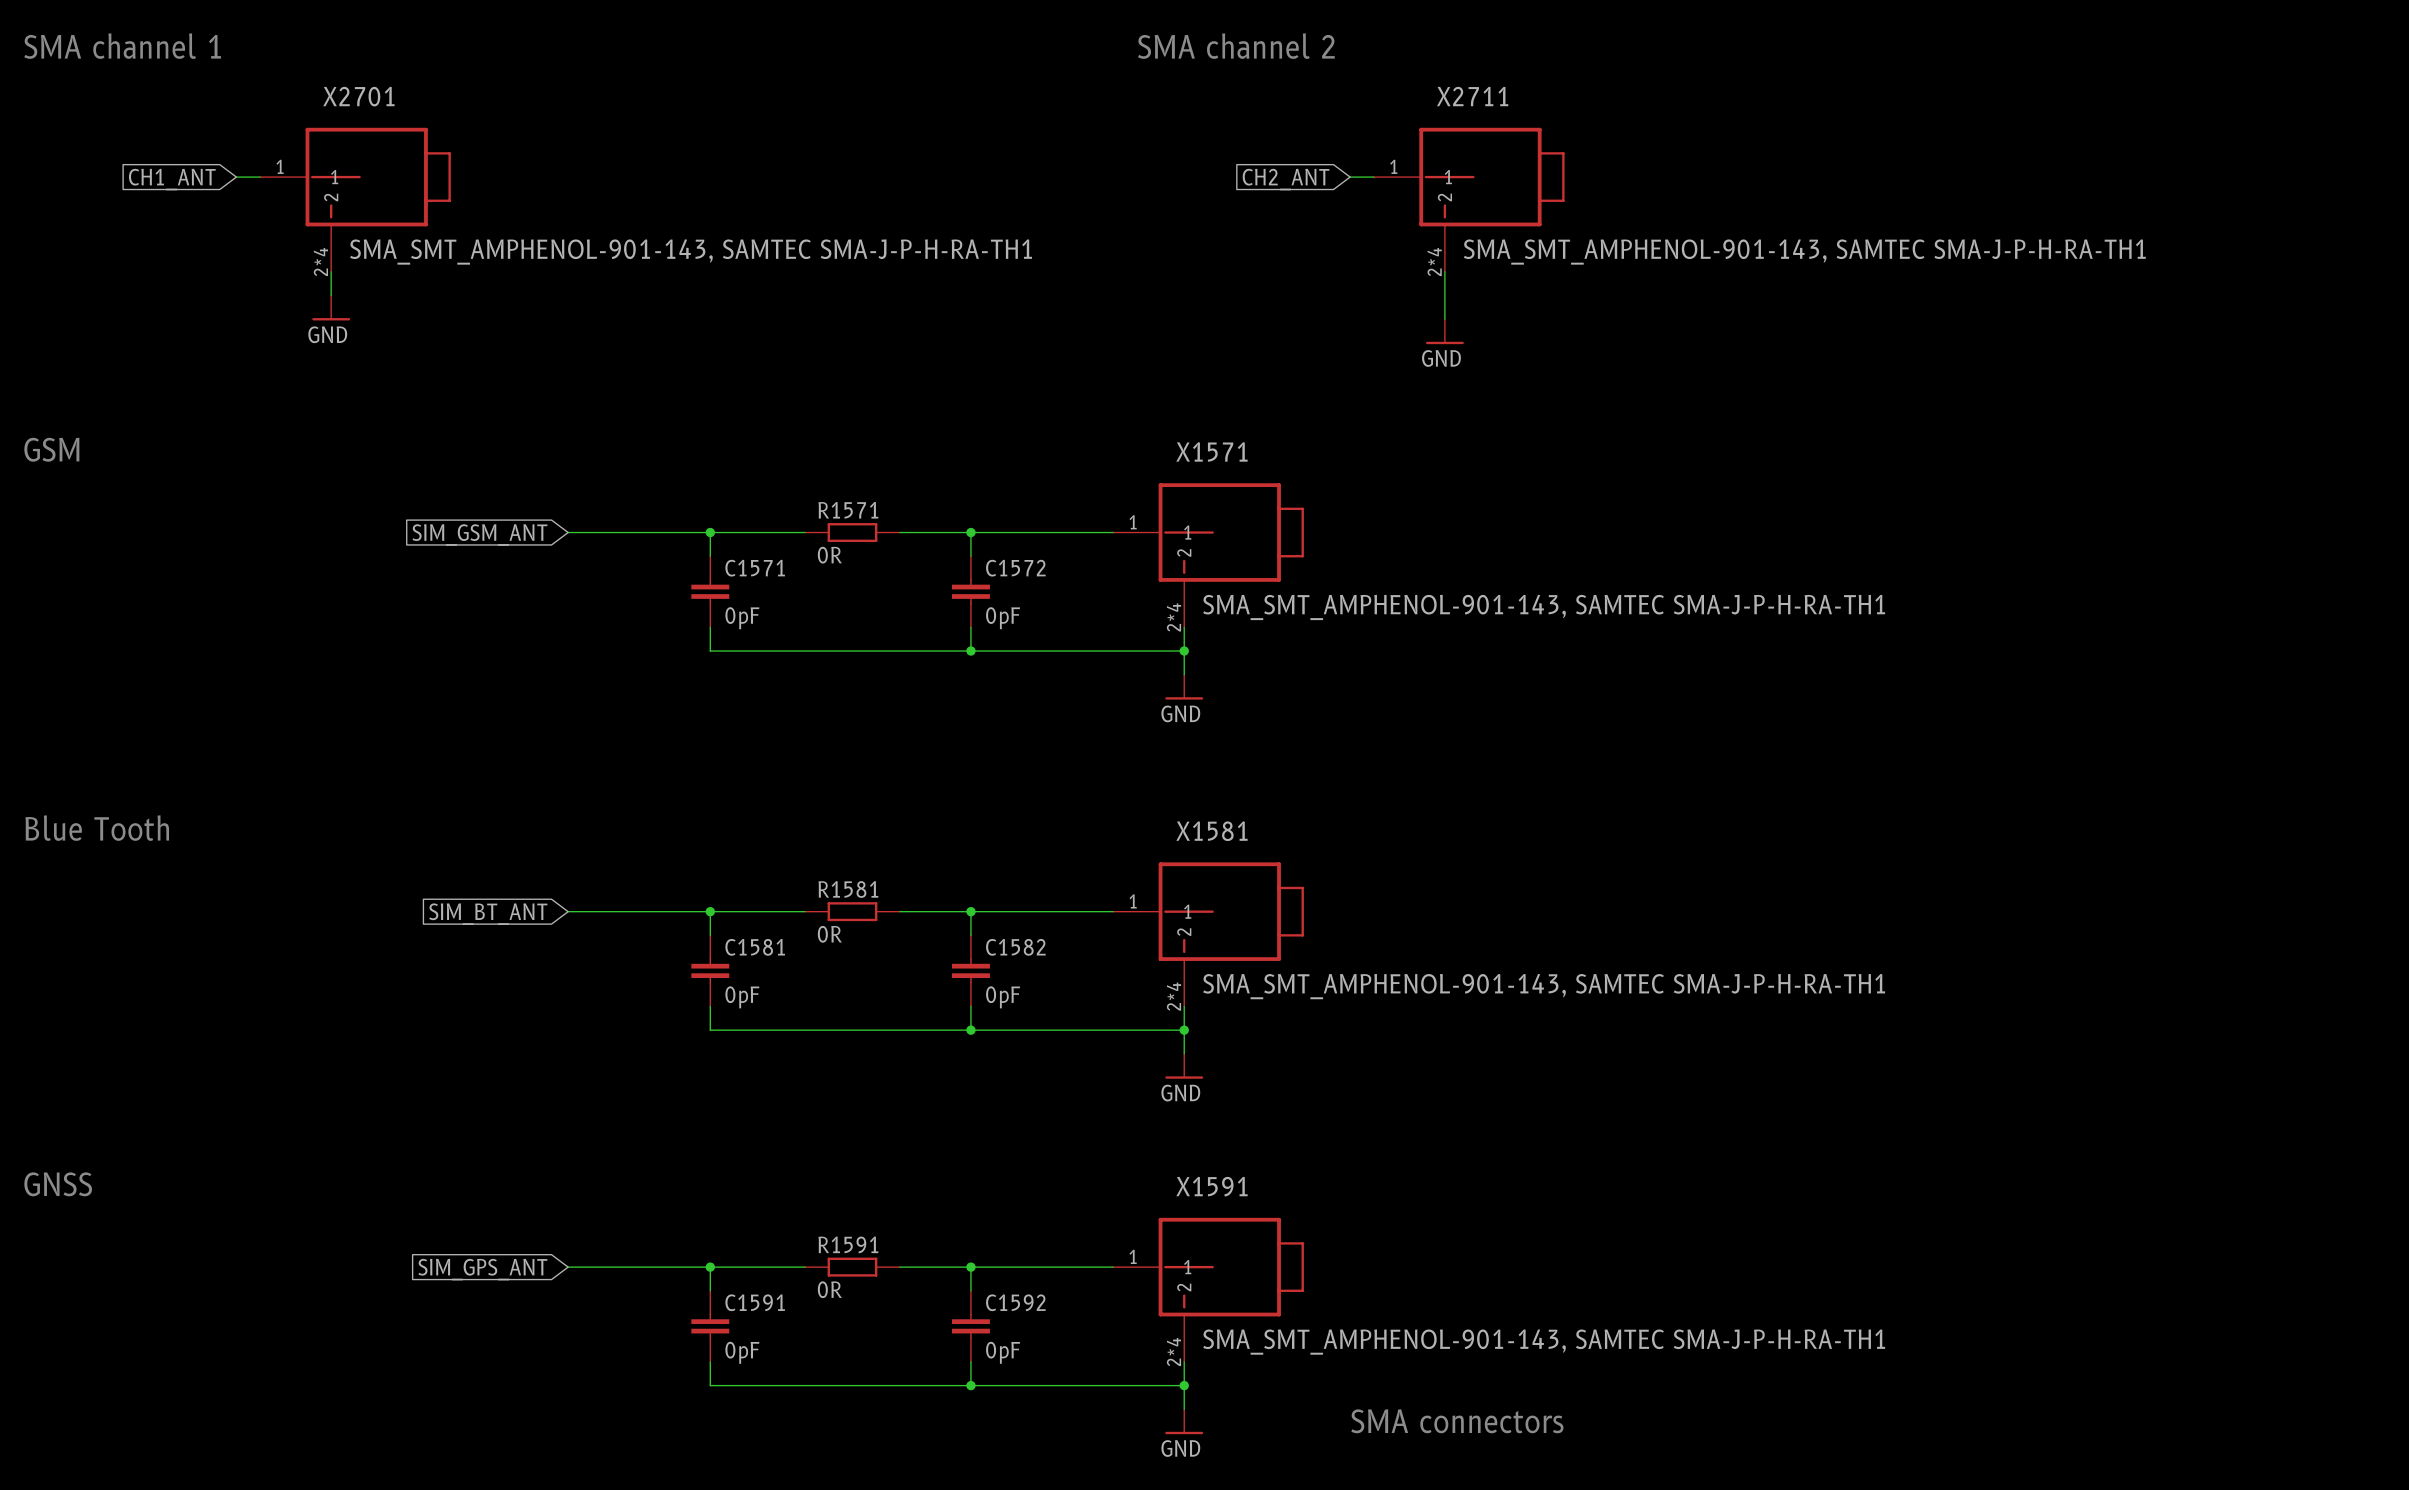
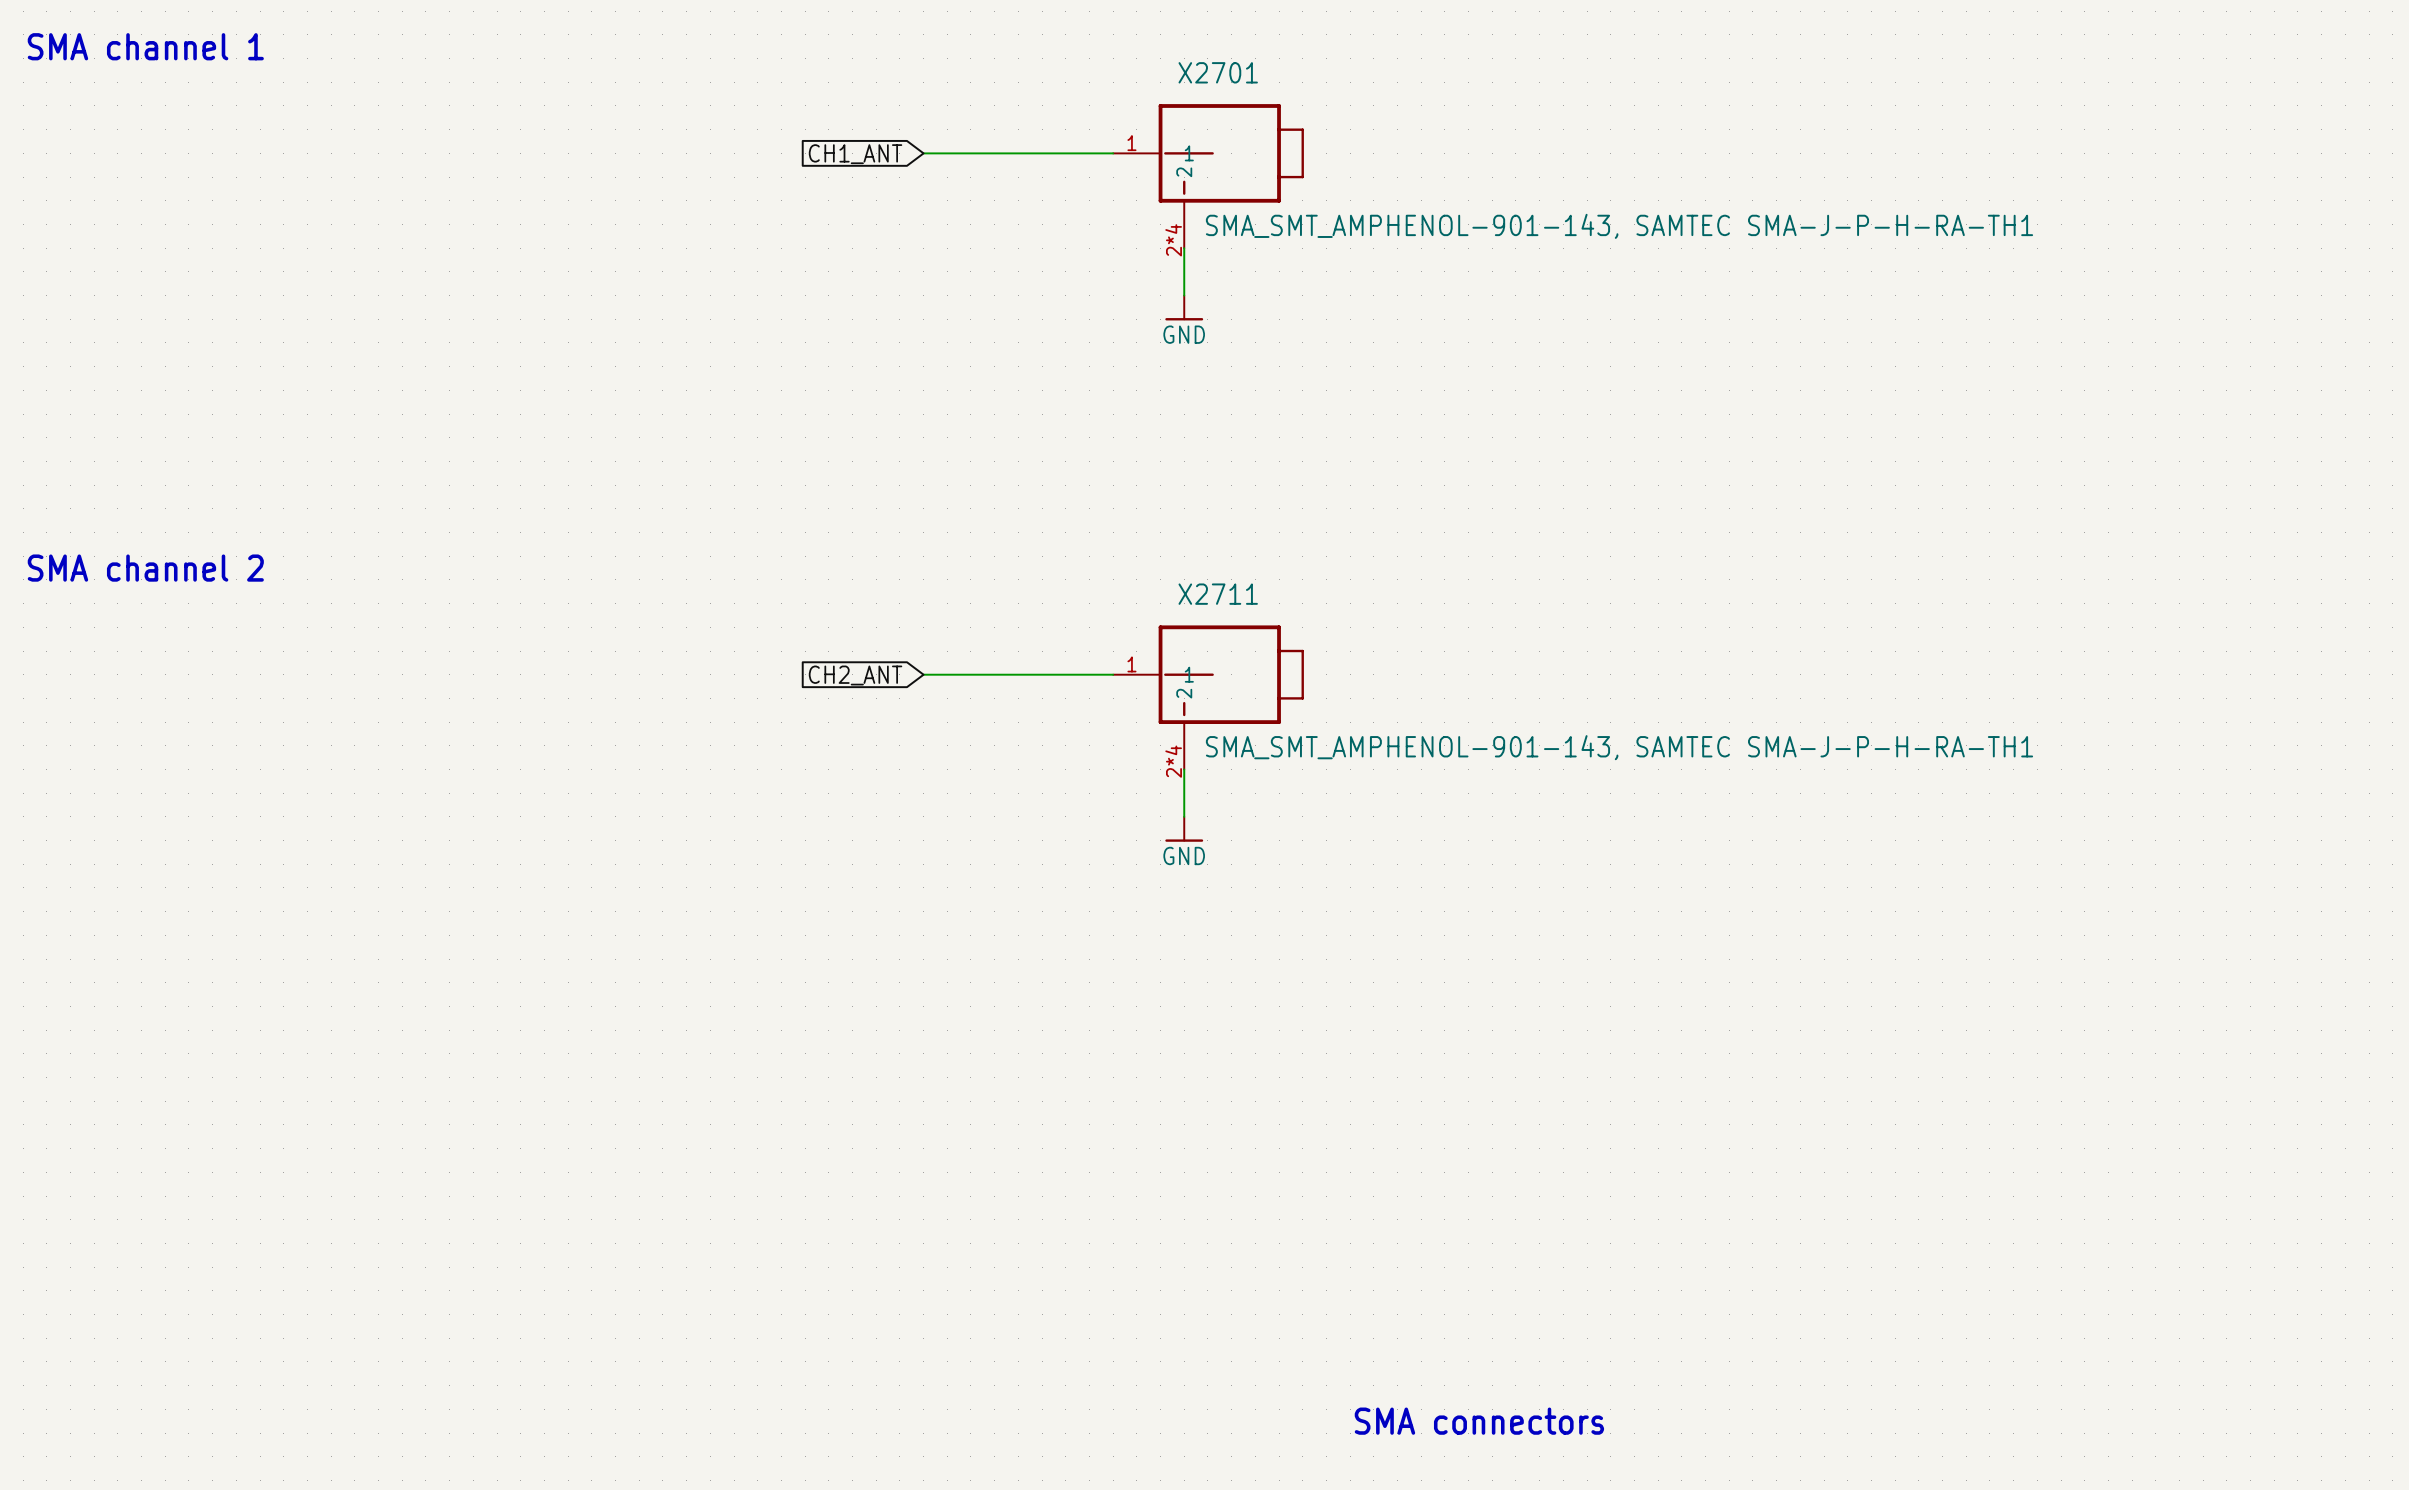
text: SMA channel 2 (1236, 46) -> none
wire: none -> (923, 153) (1113, 153)
global label: none -> CH1_ANT (855, 154)
wire: (236, 177) (260, 177) -> none
wire: (1350, 177) (1373, 177) -> none
global label: CH1_ANT (172, 179) -> none
global label: CH2_ANT (1286, 179) -> none
X2701 position: (355, 199) -> (1208, 176)
X2711 position: (1469, 199) -> (1208, 697)
wire: none -> (1184, 248) (1184, 295)
wire: (331, 271) (331, 295) -> none
wire: (1444, 271) (1444, 319) -> none
power symbol: GND (331, 308) -> none
power symbol: none -> GND (1184, 308)
power symbol: GND (1444, 331) -> none
text: GSM (51, 449) -> none
wire: (568, 532) (805, 532) -> none
wire: (710, 532) (710, 556) -> none
junction: (710, 532) -> none
R1571: 0R (852, 532) -> none
wire: (899, 532) (1113, 532) -> none
wire: (970, 532) (970, 556) -> none
junction: (970, 532) -> none
global label: SIM_GSM_ANT (479, 535) -> none
X1571: SMA_SMT_AMPHENOL-901-143, SAMTEC SMA-J-P-H-RA-TH1 (1208, 555) -> none
text: none -> SMA channel 2 (145, 568)
C1571: 0pF (710, 591) -> none
C1572: 0pF (970, 591) -> none
wire: (710, 627) (710, 651) (1184, 651) -> none
wire: (970, 627) (970, 651) -> none
wire: (1184, 627) (1184, 674) -> (1184, 769) (1184, 816)
junction: (970, 651) -> none
junction: (1184, 651) -> none
wire: none -> (923, 674) (1113, 674)
global label: none -> CH2_ANT (855, 675)
power symbol: GND (1184, 687) -> none
text: Blue Tooth (97, 828) -> none
power symbol: none -> GND (1184, 829)
wire: (568, 911) (805, 911) -> none
wire: (710, 911) (710, 935) -> none
junction: (710, 911) -> none
R1581: 0R (852, 911) -> none
wire: (899, 911) (1113, 911) -> none
wire: (970, 911) (970, 935) -> none
junction: (970, 911) -> none
global label: SIM_BT_ANT (488, 914) -> none
X1581: SMA_SMT_AMPHENOL-901-143, SAMTEC SMA-J-P-H-RA-TH1 (1208, 934) -> none
C1581: 0pF (710, 970) -> none
C1582: 0pF (970, 970) -> none
wire: (710, 1006) (710, 1030) (1184, 1030) -> none
wire: (970, 1006) (970, 1030) -> none
wire: (1184, 1006) (1184, 1053) -> none
junction: (970, 1030) -> none
junction: (1184, 1030) -> none
power symbol: GND (1184, 1066) -> none
text: GNSS (58, 1184) -> none
wire: (568, 1267) (805, 1267) -> none
wire: (710, 1267) (710, 1290) -> none
junction: (710, 1267) -> none
R1591: 0R (852, 1267) -> none
wire: (899, 1267) (1113, 1267) -> none
wire: (970, 1267) (970, 1290) -> none
junction: (970, 1267) -> none
global label: SIM_GPS_ANT (482, 1269) -> none
X1591: SMA_SMT_AMPHENOL-901-143, SAMTEC SMA-J-P-H-RA-TH1 (1208, 1289) -> none
C1591: 0pF (710, 1326) -> none
C1592: 0pF (970, 1326) -> none
wire: (710, 1361) (710, 1385) (1184, 1385) -> none
wire: (970, 1361) (970, 1385) -> none
wire: (1184, 1361) (1184, 1409) -> none
junction: (970, 1385) -> none
junction: (1184, 1385) -> none
power symbol: GND (1184, 1421) -> none

